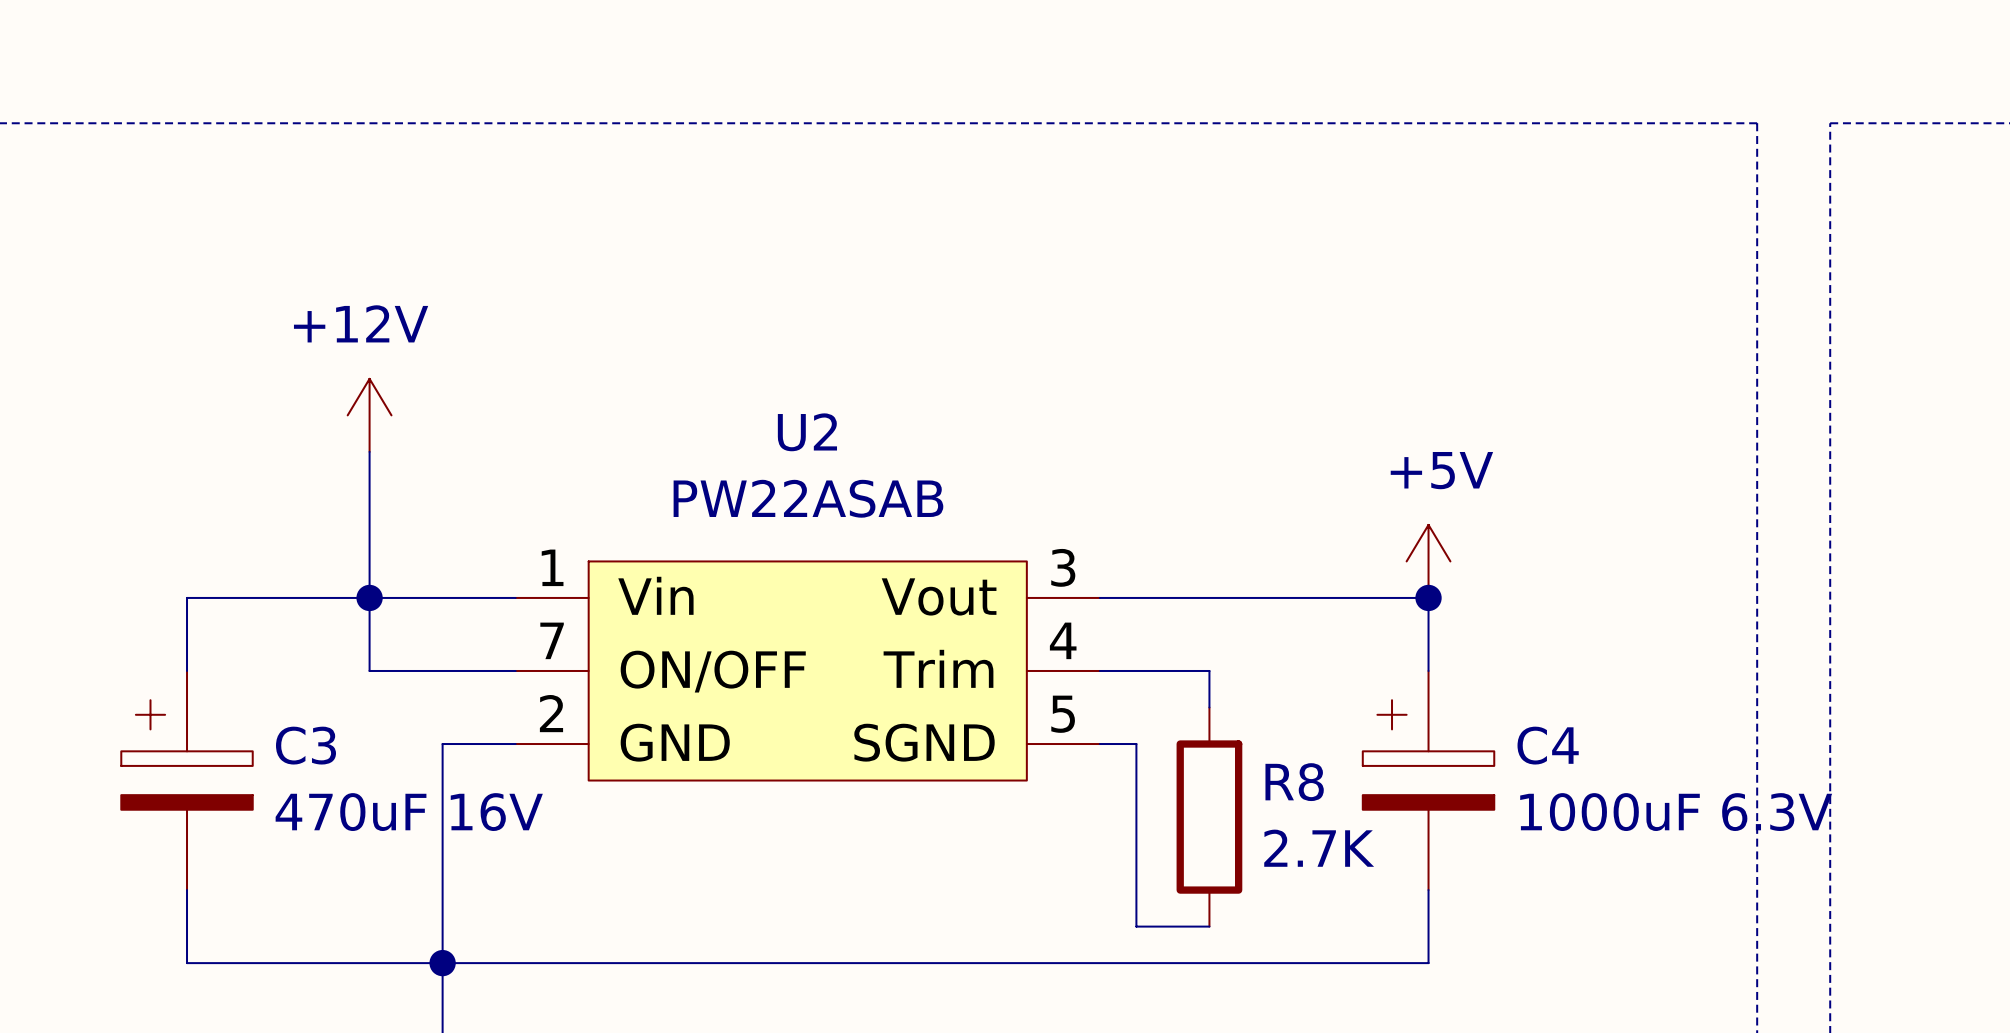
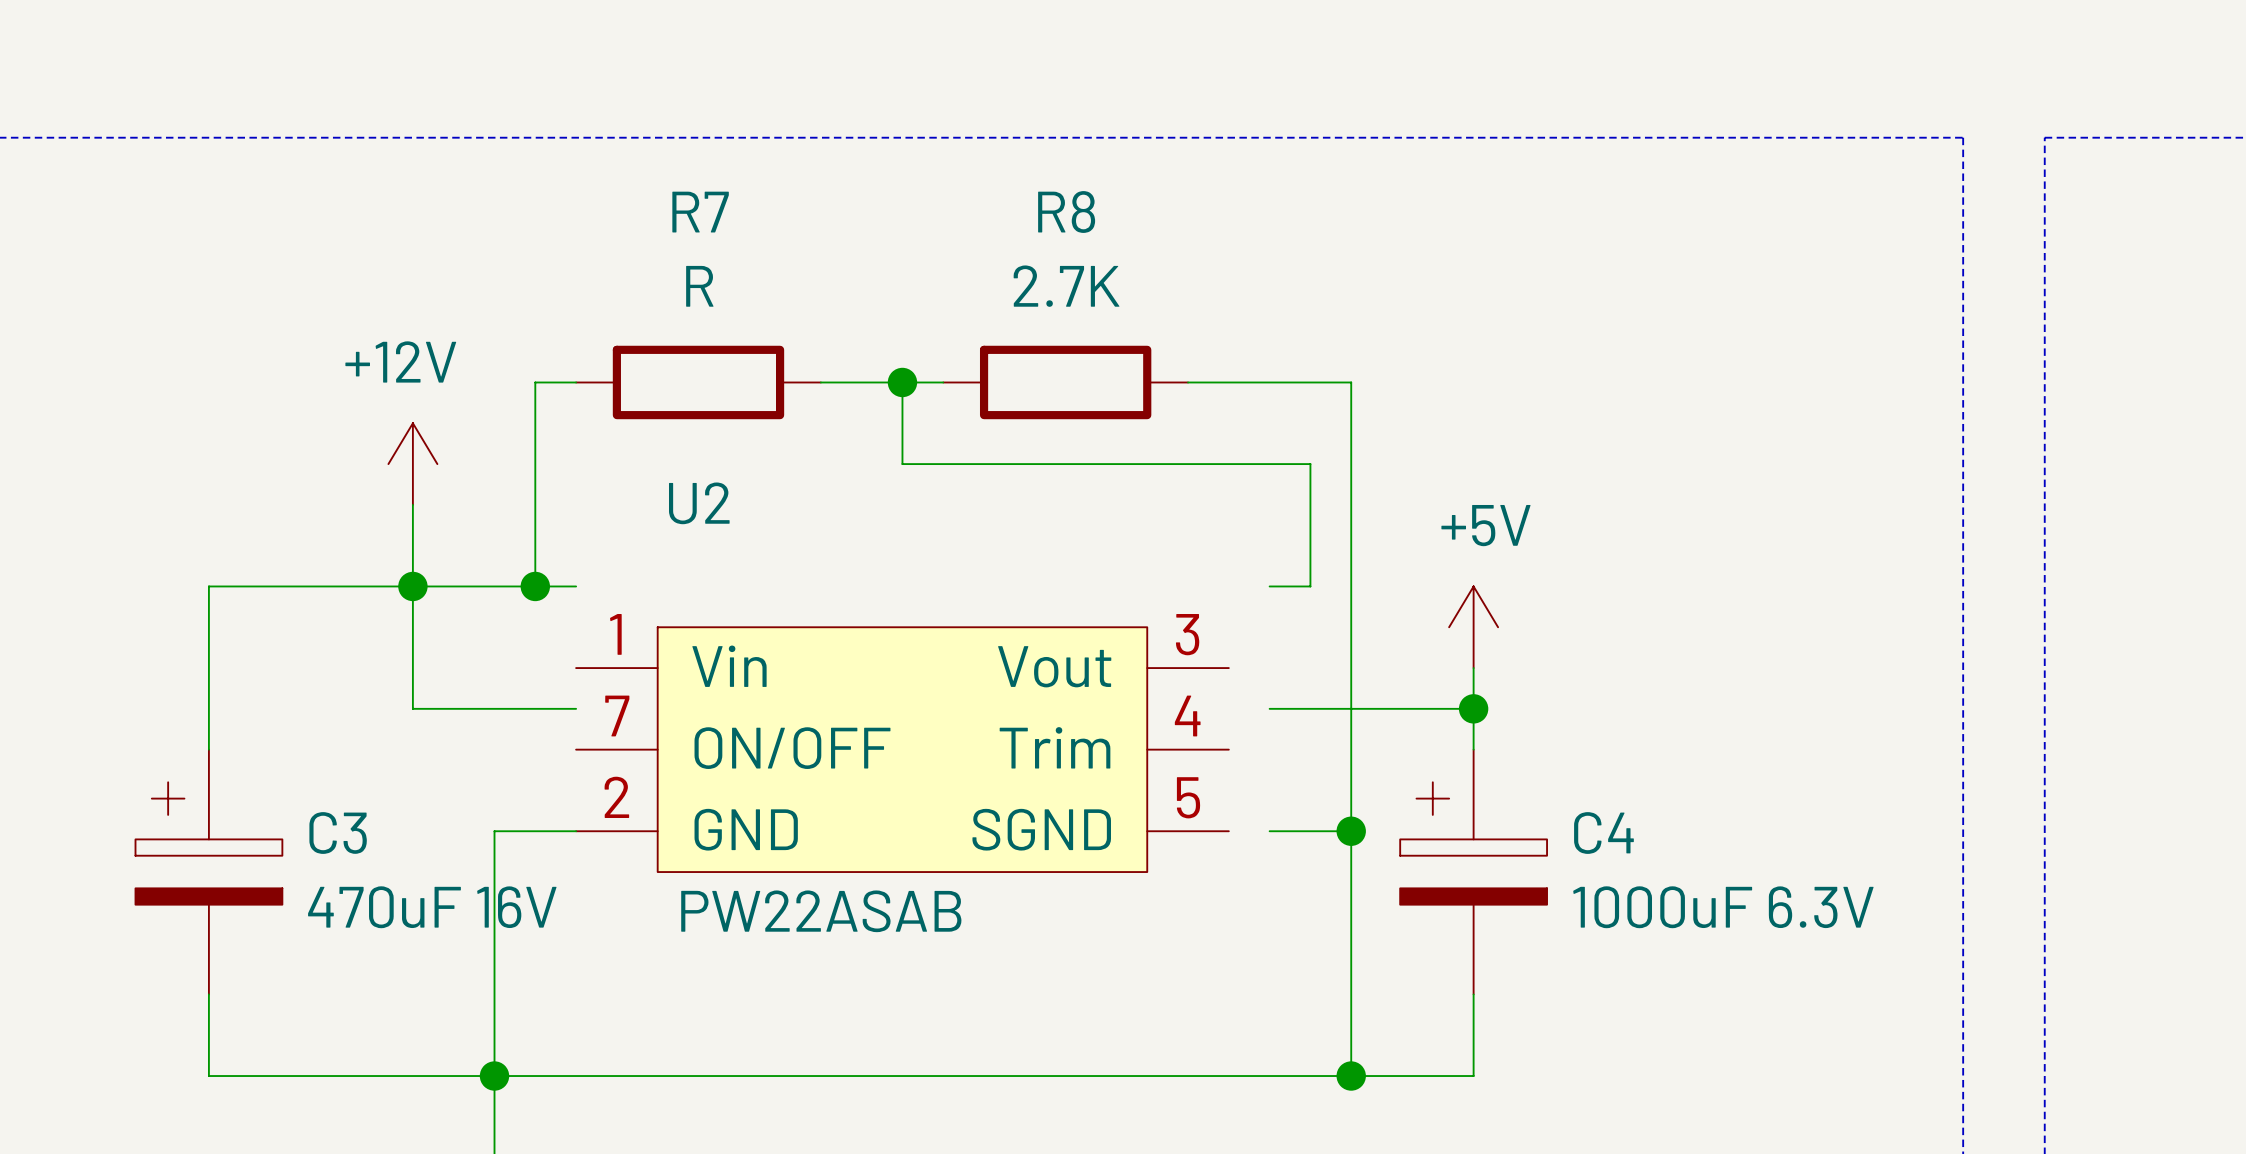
wire: none -> (576, 382) (535, 382) (535, 586)
R7: none -> R (698, 382)
wire: none -> (820, 382) (943, 382)
wire: none -> (902, 382) (902, 464) (1310, 464) (1310, 586) (1269, 586)
junction: none -> (902, 382)
U2 name position: U2 (807, 432) -> U2 (699, 503)
U2 value position: PW22ASAB (808, 498) -> PW22ASAB (821, 911)
junction: none -> (412, 586)
junction: none -> (535, 586)
power symbol position: +5V (1428, 561) -> +5V (1473, 627)
wire: (187, 597) (515, 597) -> (208, 668) (208, 586) (576, 586)
junction: (369, 597) -> none
wire: (1099, 597) (1428, 597) (1428, 670) -> none
wire: none -> (1473, 668) (1473, 749)
junction position: (1428, 597) -> (1473, 708)
wire: (369, 634) (369, 670) (515, 670) -> (412, 708) (576, 708)
wire: none -> (1269, 708) (1473, 708)
wire: (1099, 670) (1209, 670) -> (1188, 382) (1351, 382) (1351, 749)
wire: none -> (1351, 790) (1351, 1076)
wire: (1099, 744) (1136, 744) (1136, 926) (1209, 926) -> none
wire: none -> (1269, 831) (1351, 831)
junction: none -> (1351, 831)
C4 position: (1428, 780) -> (1473, 872)
R8 name position: R8 (1294, 782) -> R8 (1066, 212)
R8 rotation: 0° (1209, 817) -> 90° clockwise (1065, 382)
R8 position: (1209, 817) -> (1065, 382)
R8 value position: 2.7K (1319, 848) -> 2.7K (1066, 286)
wire: (1428, 890) (1428, 963) (1318, 963) -> (1473, 994) (1473, 1076)
junction: none -> (1351, 1076)

